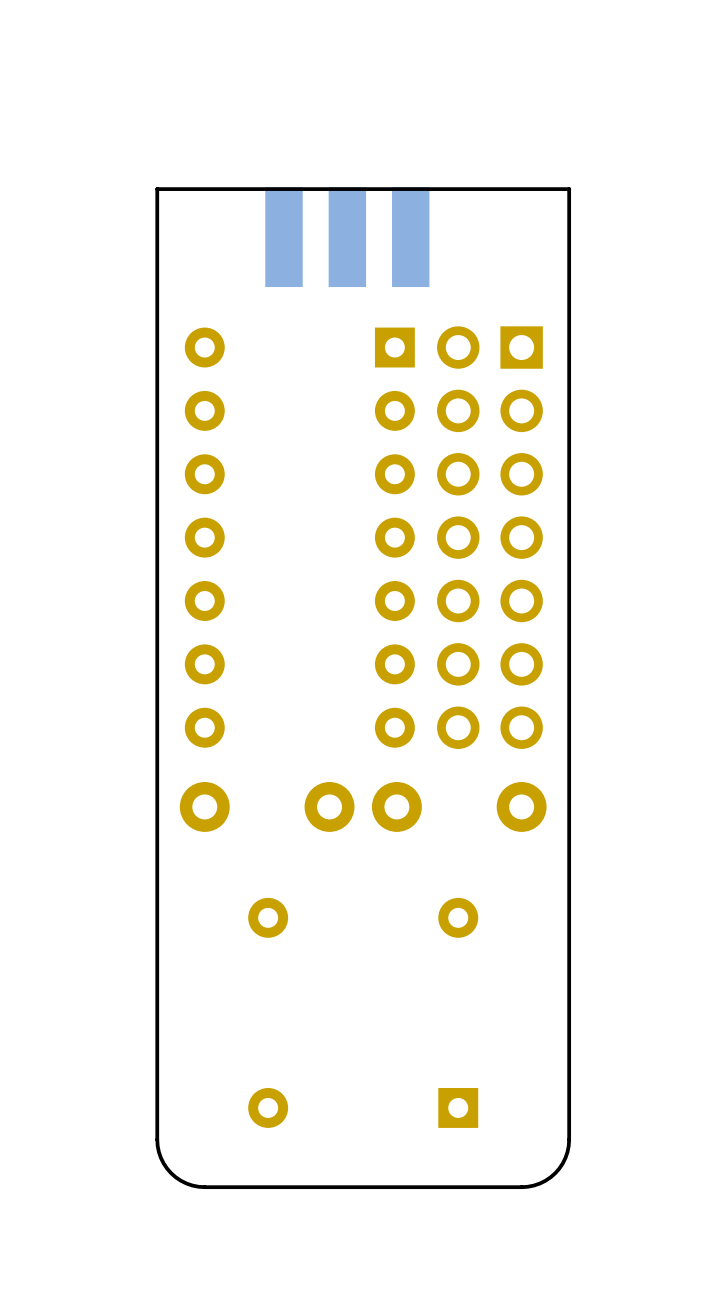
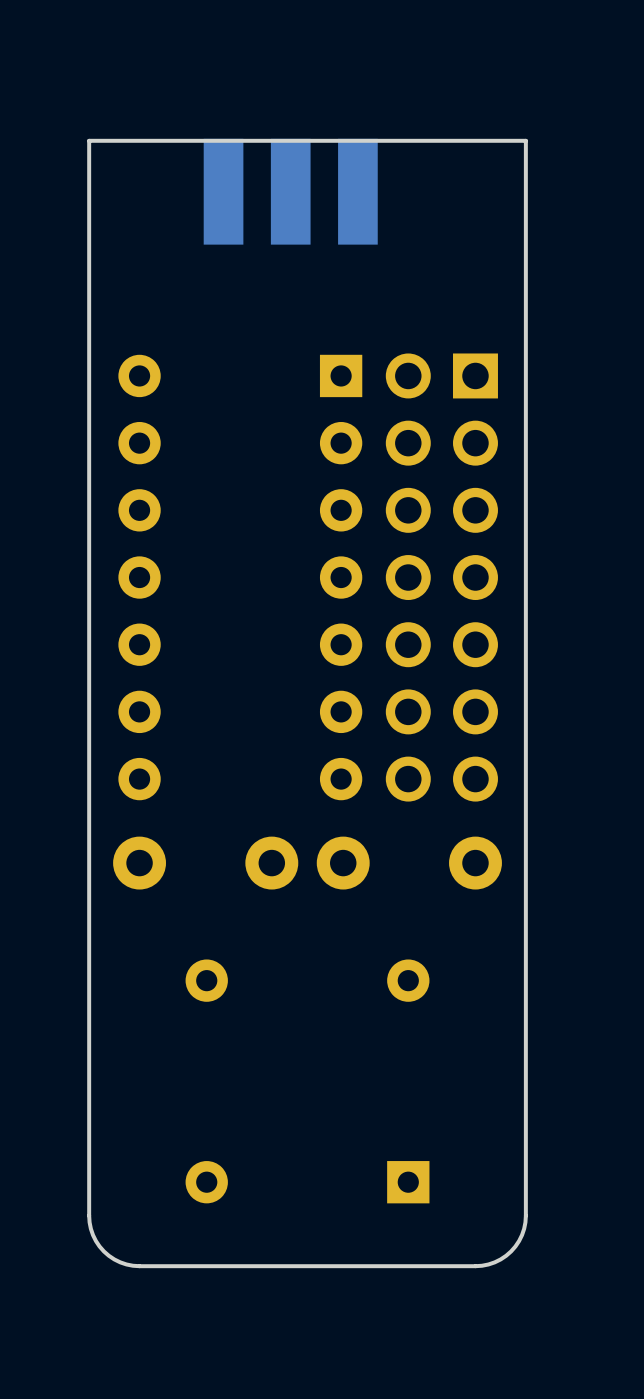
board edge: (569, 189) (157, 189) -> (525, 207) (525, 140) (89, 140) (89, 207)
part position: (347, 237) -> (290, 191)

